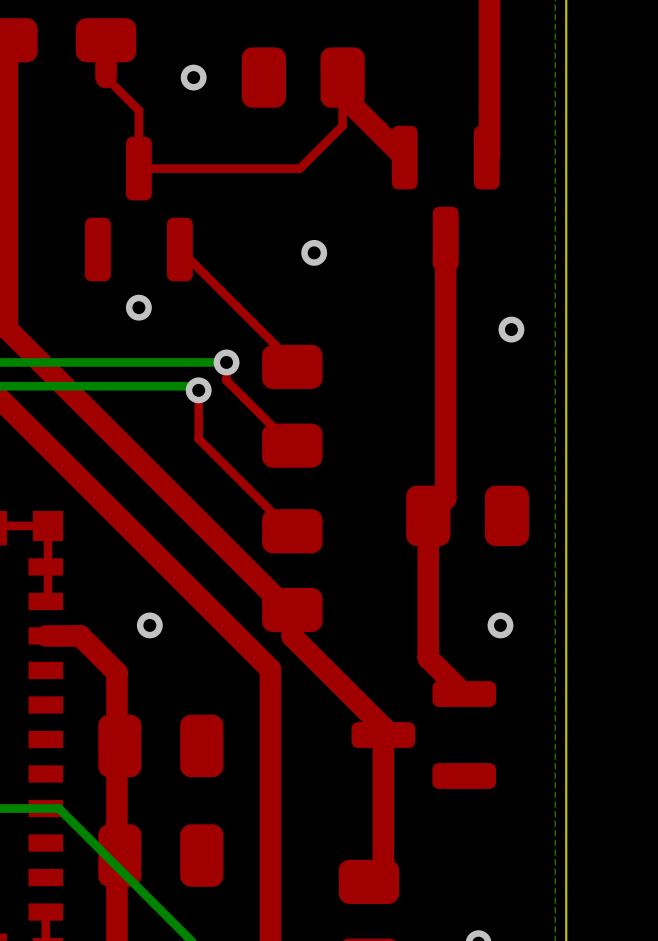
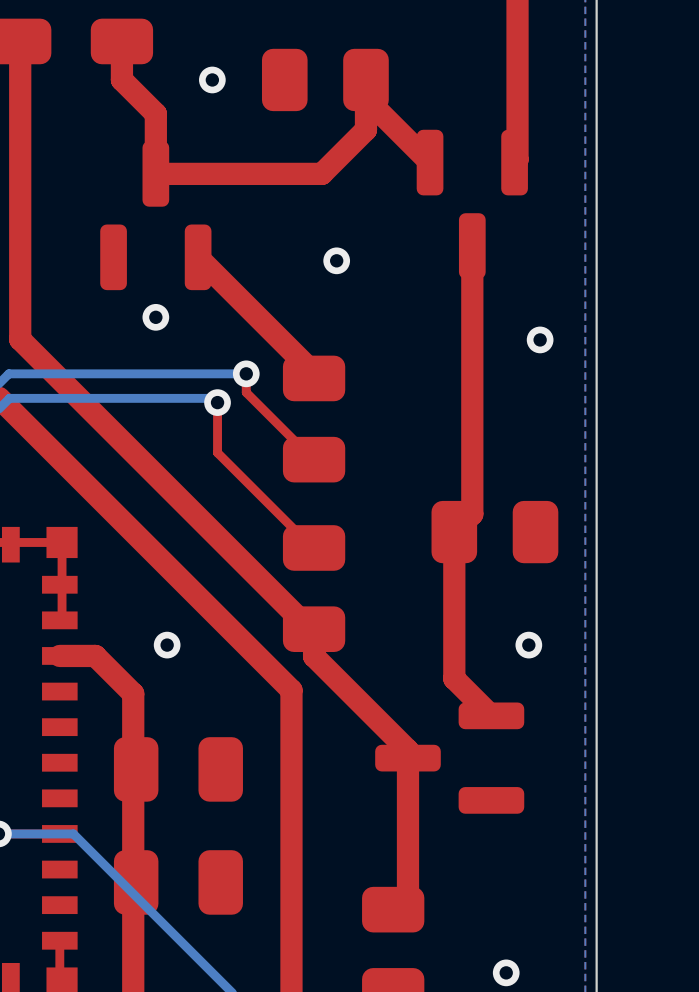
top track width: thin (106, 77) (138, 110) (138, 168) (299, 168) (342, 125) (342, 96) -> thick (121, 79) (155, 113) (155, 173) (321, 173) (365, 129) (365, 99)
top track width: thin (179, 249) (292, 361) -> thick (198, 257) (314, 373)

